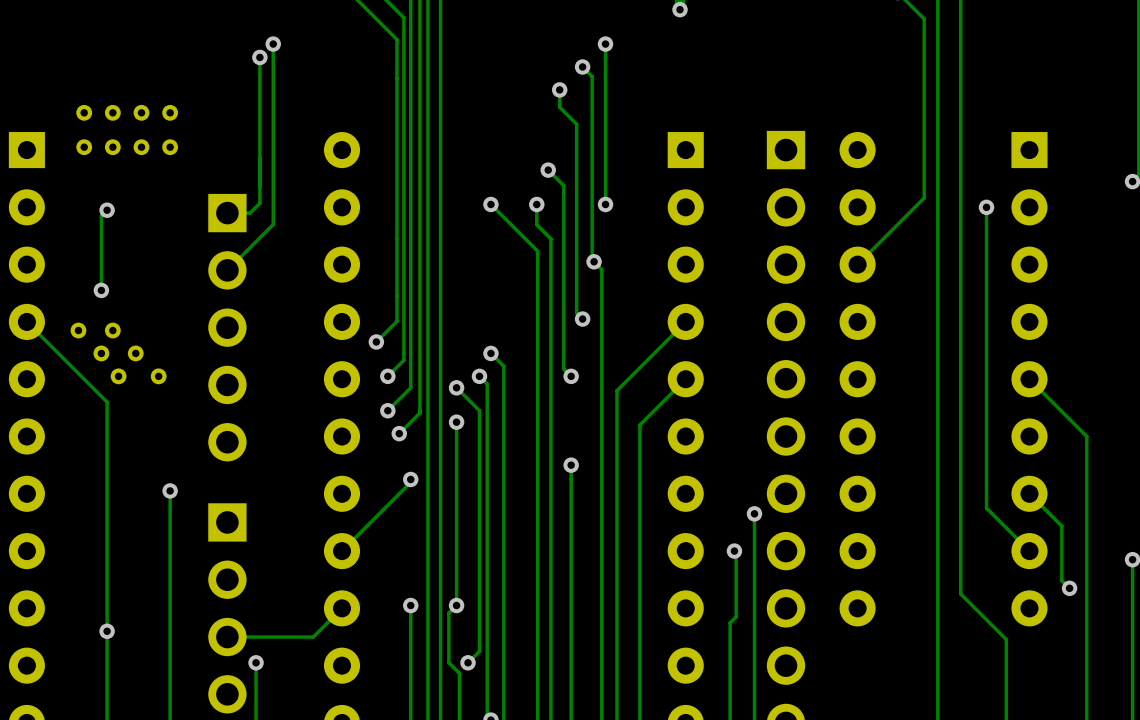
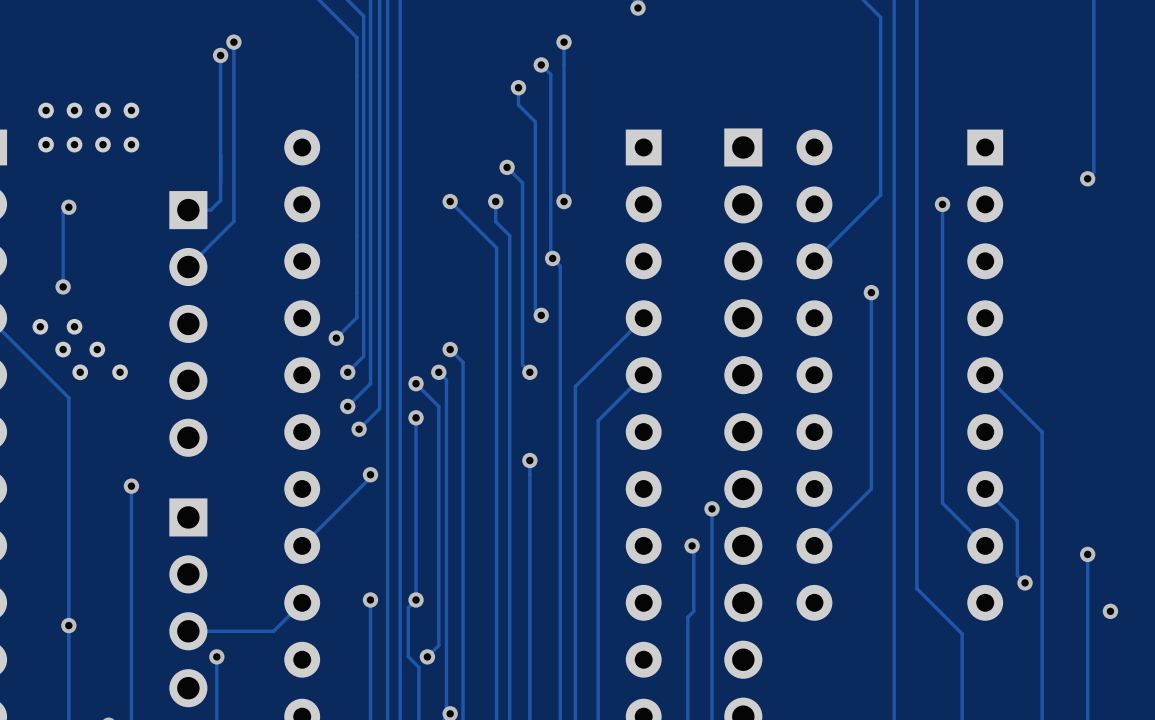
track: none -> (871, 292) (871, 488) (814, 545)
via: none -> (871, 292)

